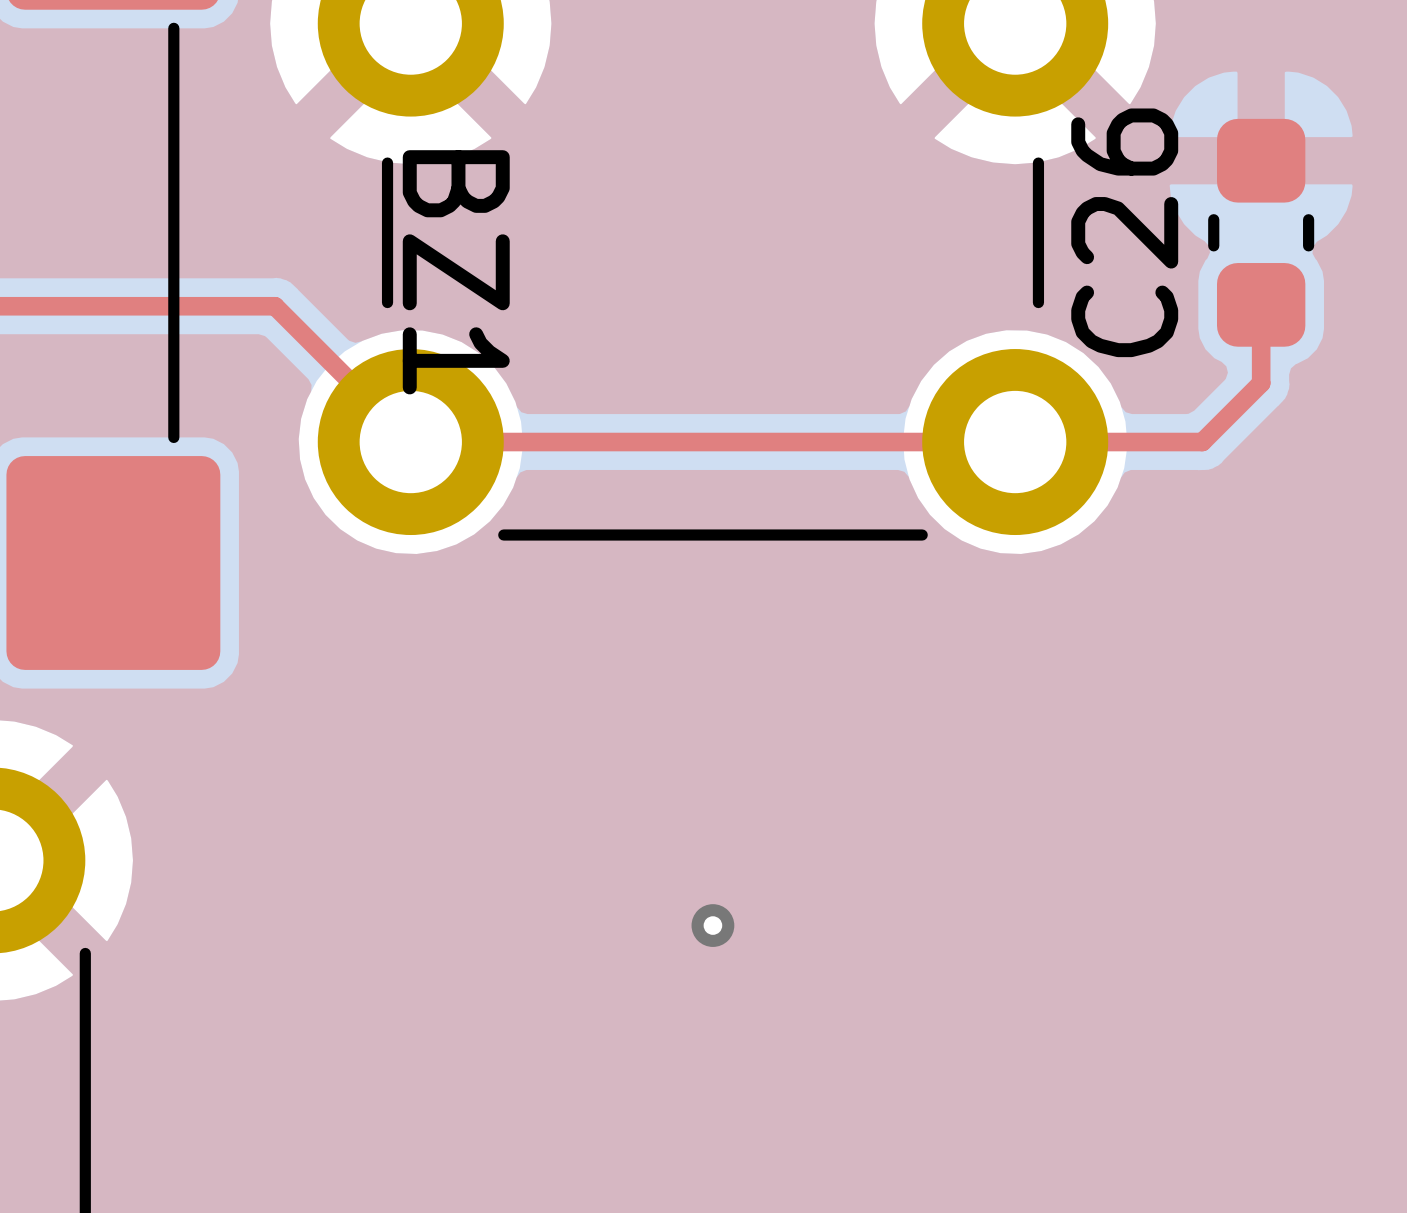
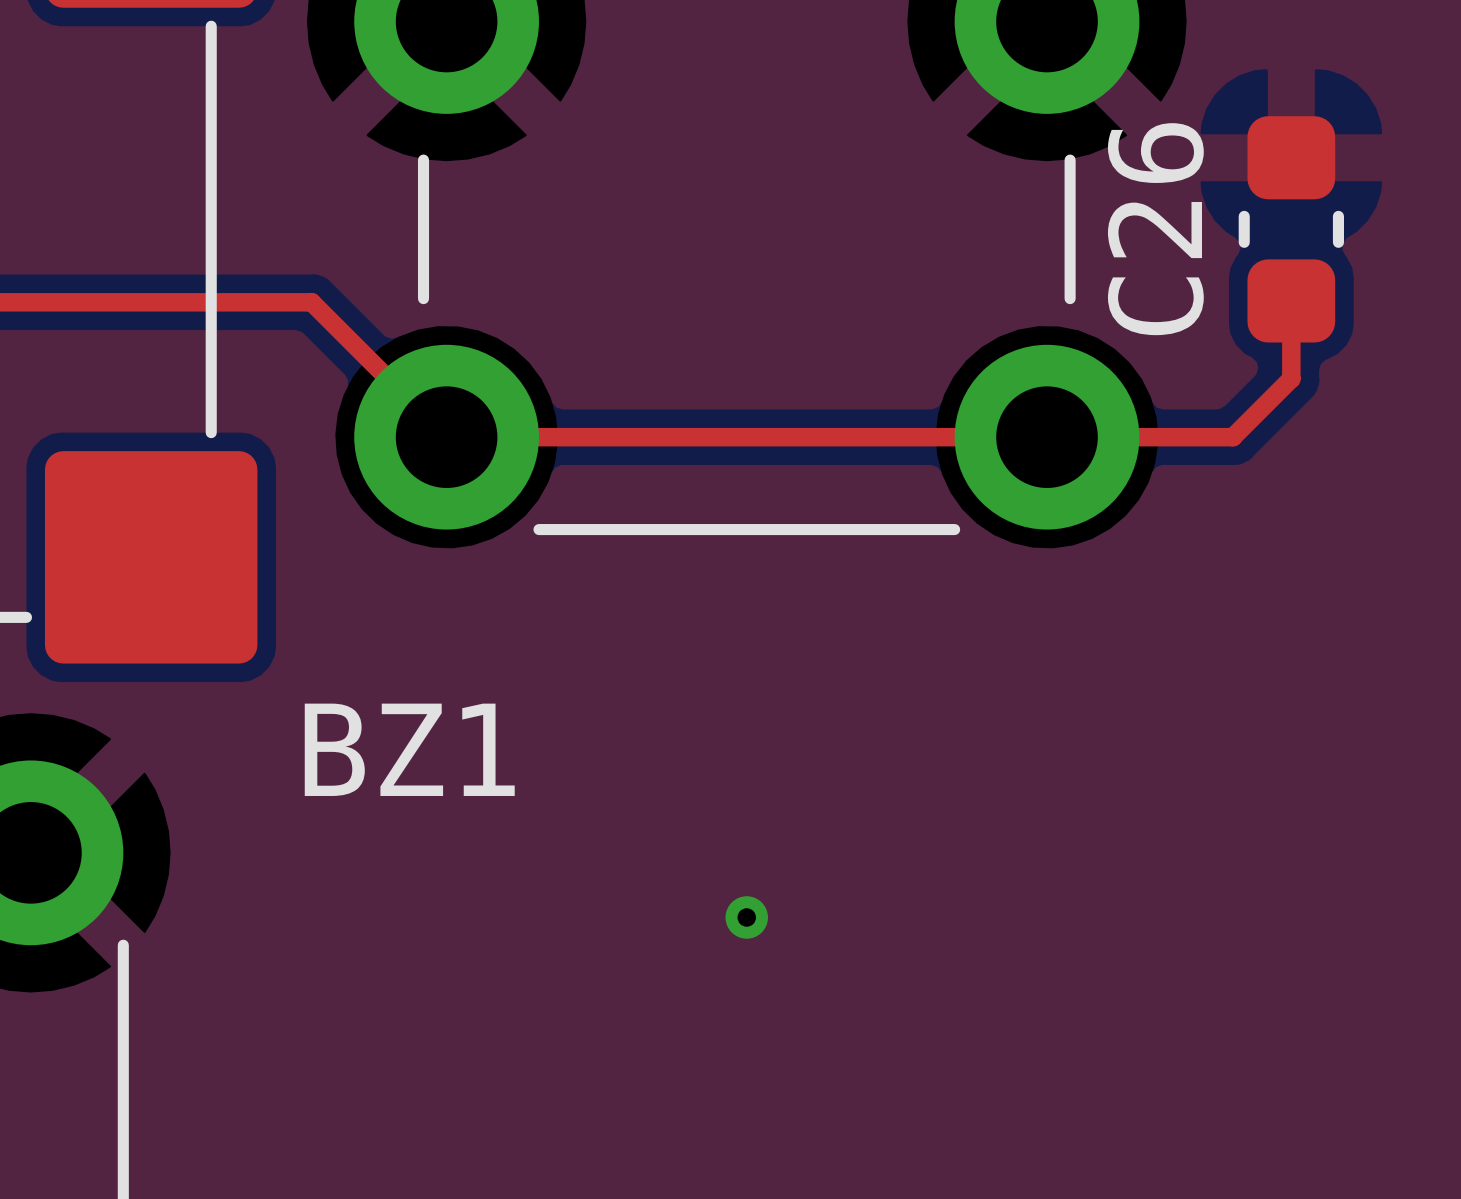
BZ1 name rotation: 0° (456, 272) -> 90° counterclockwise (409, 749)
BZ1 name position: BZ1 (456, 272) -> BZ1 (409, 749)

